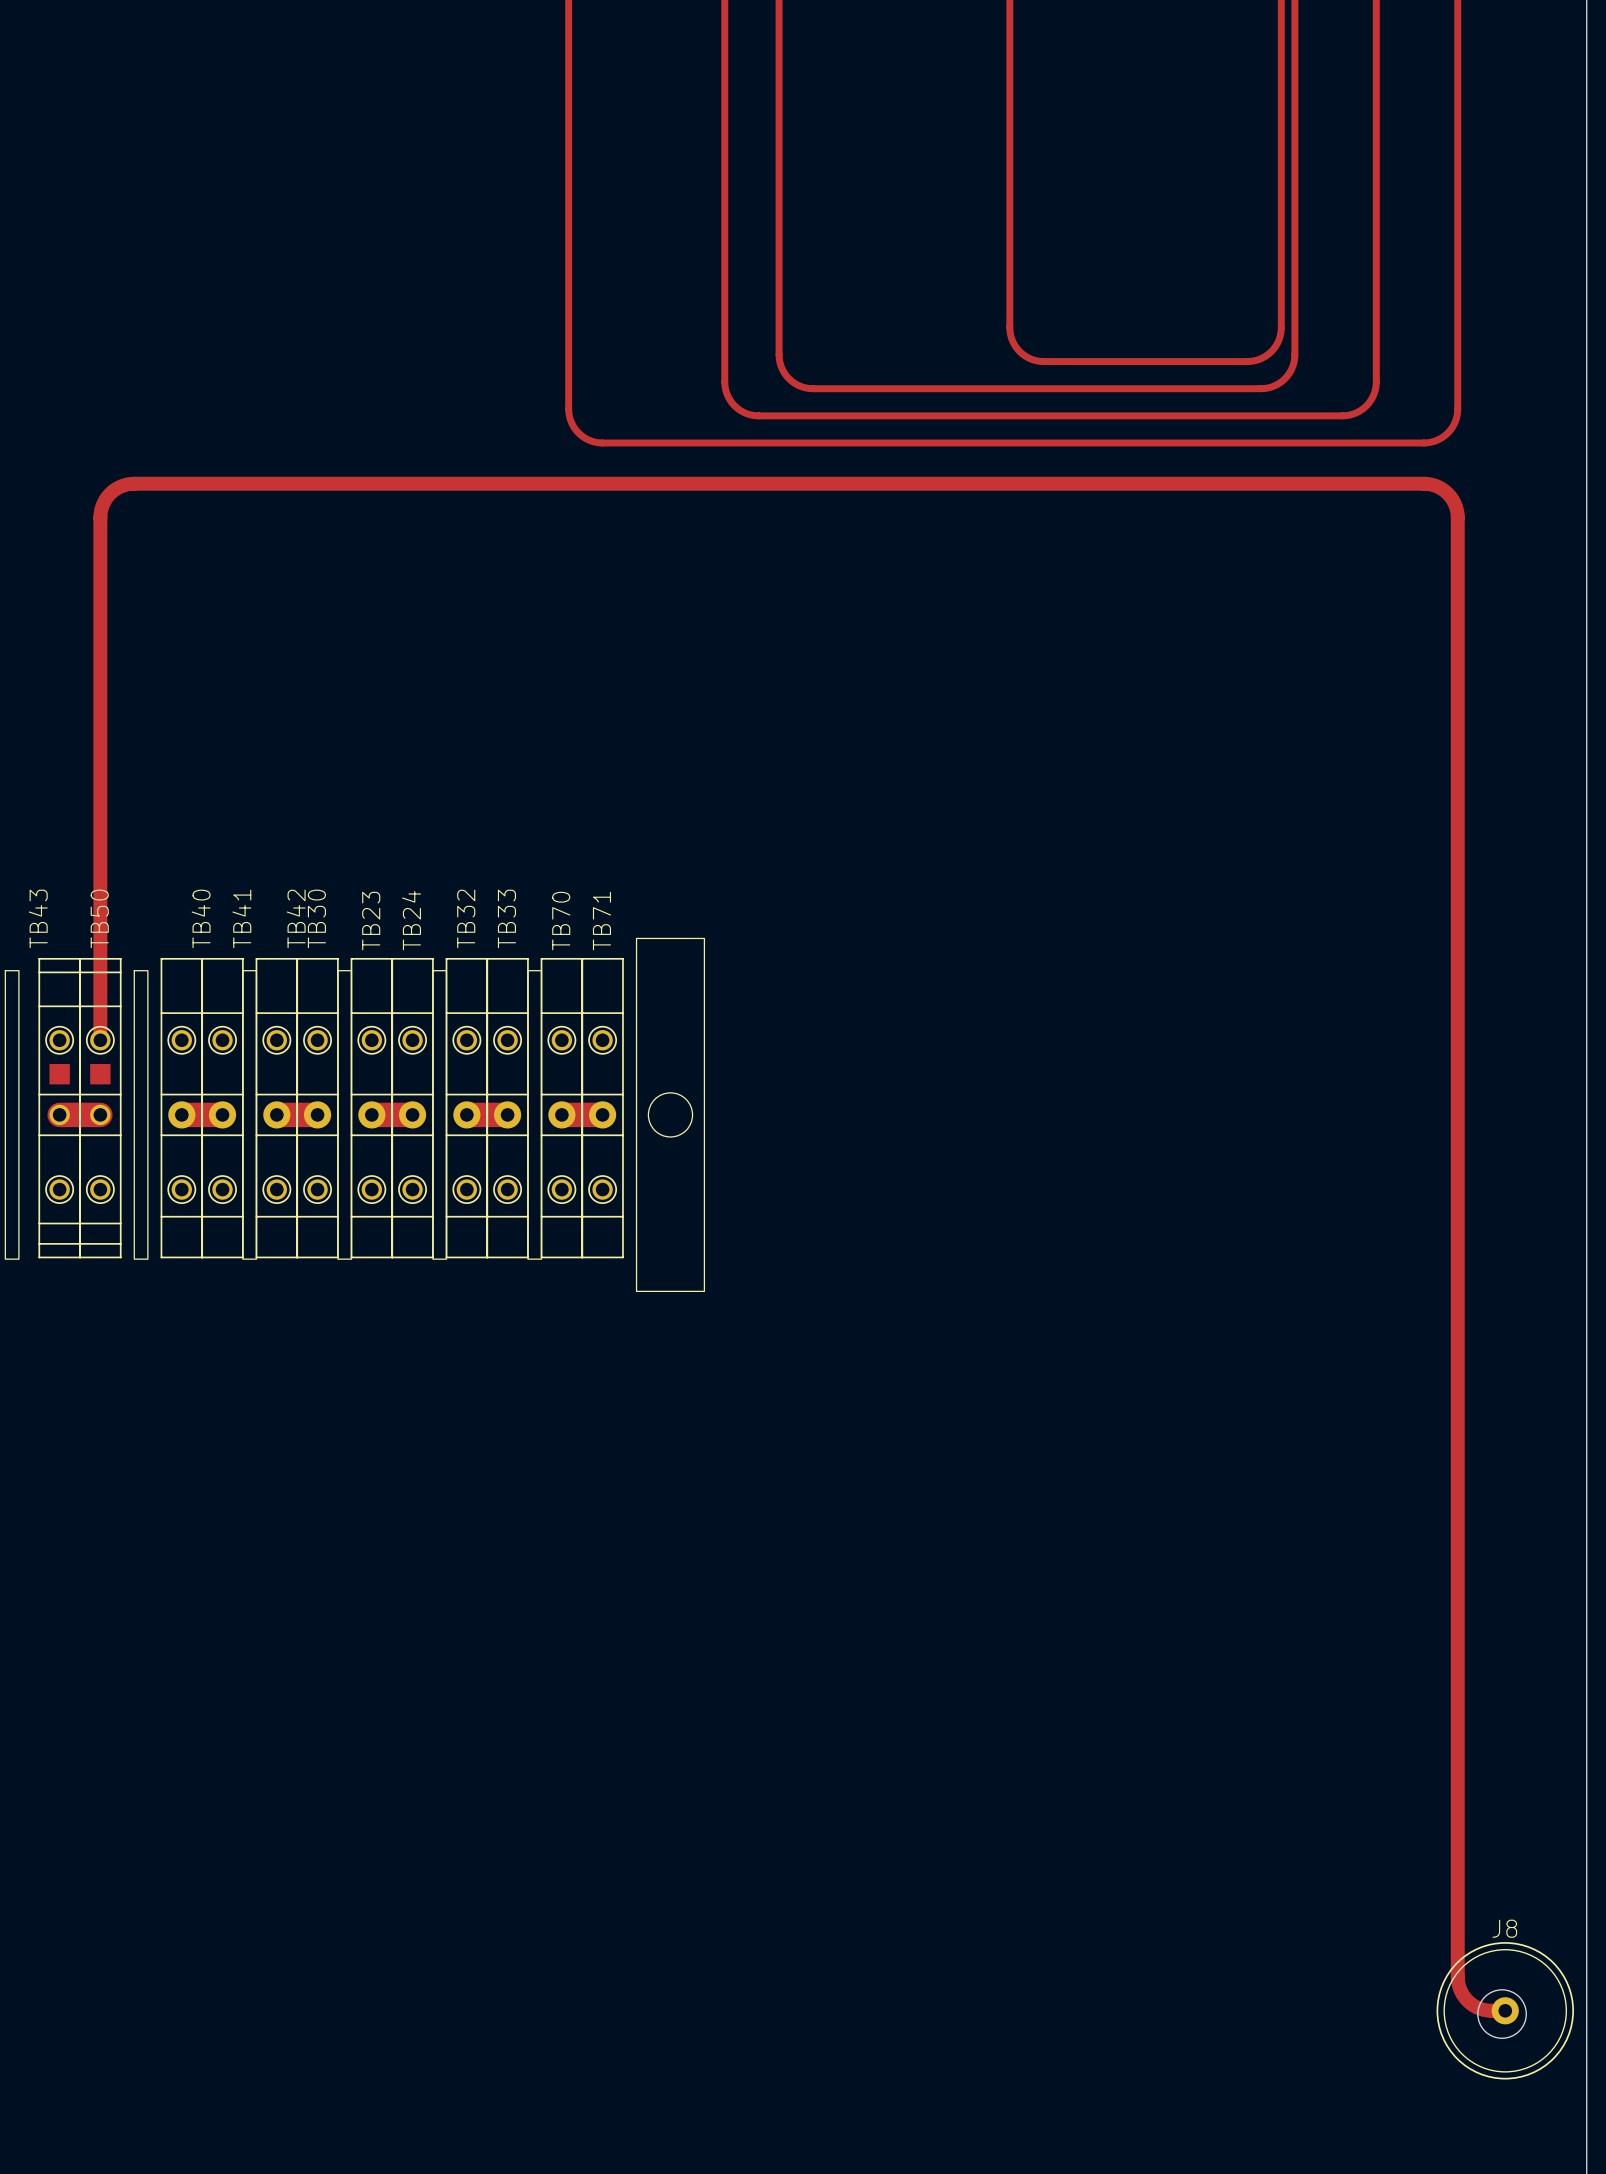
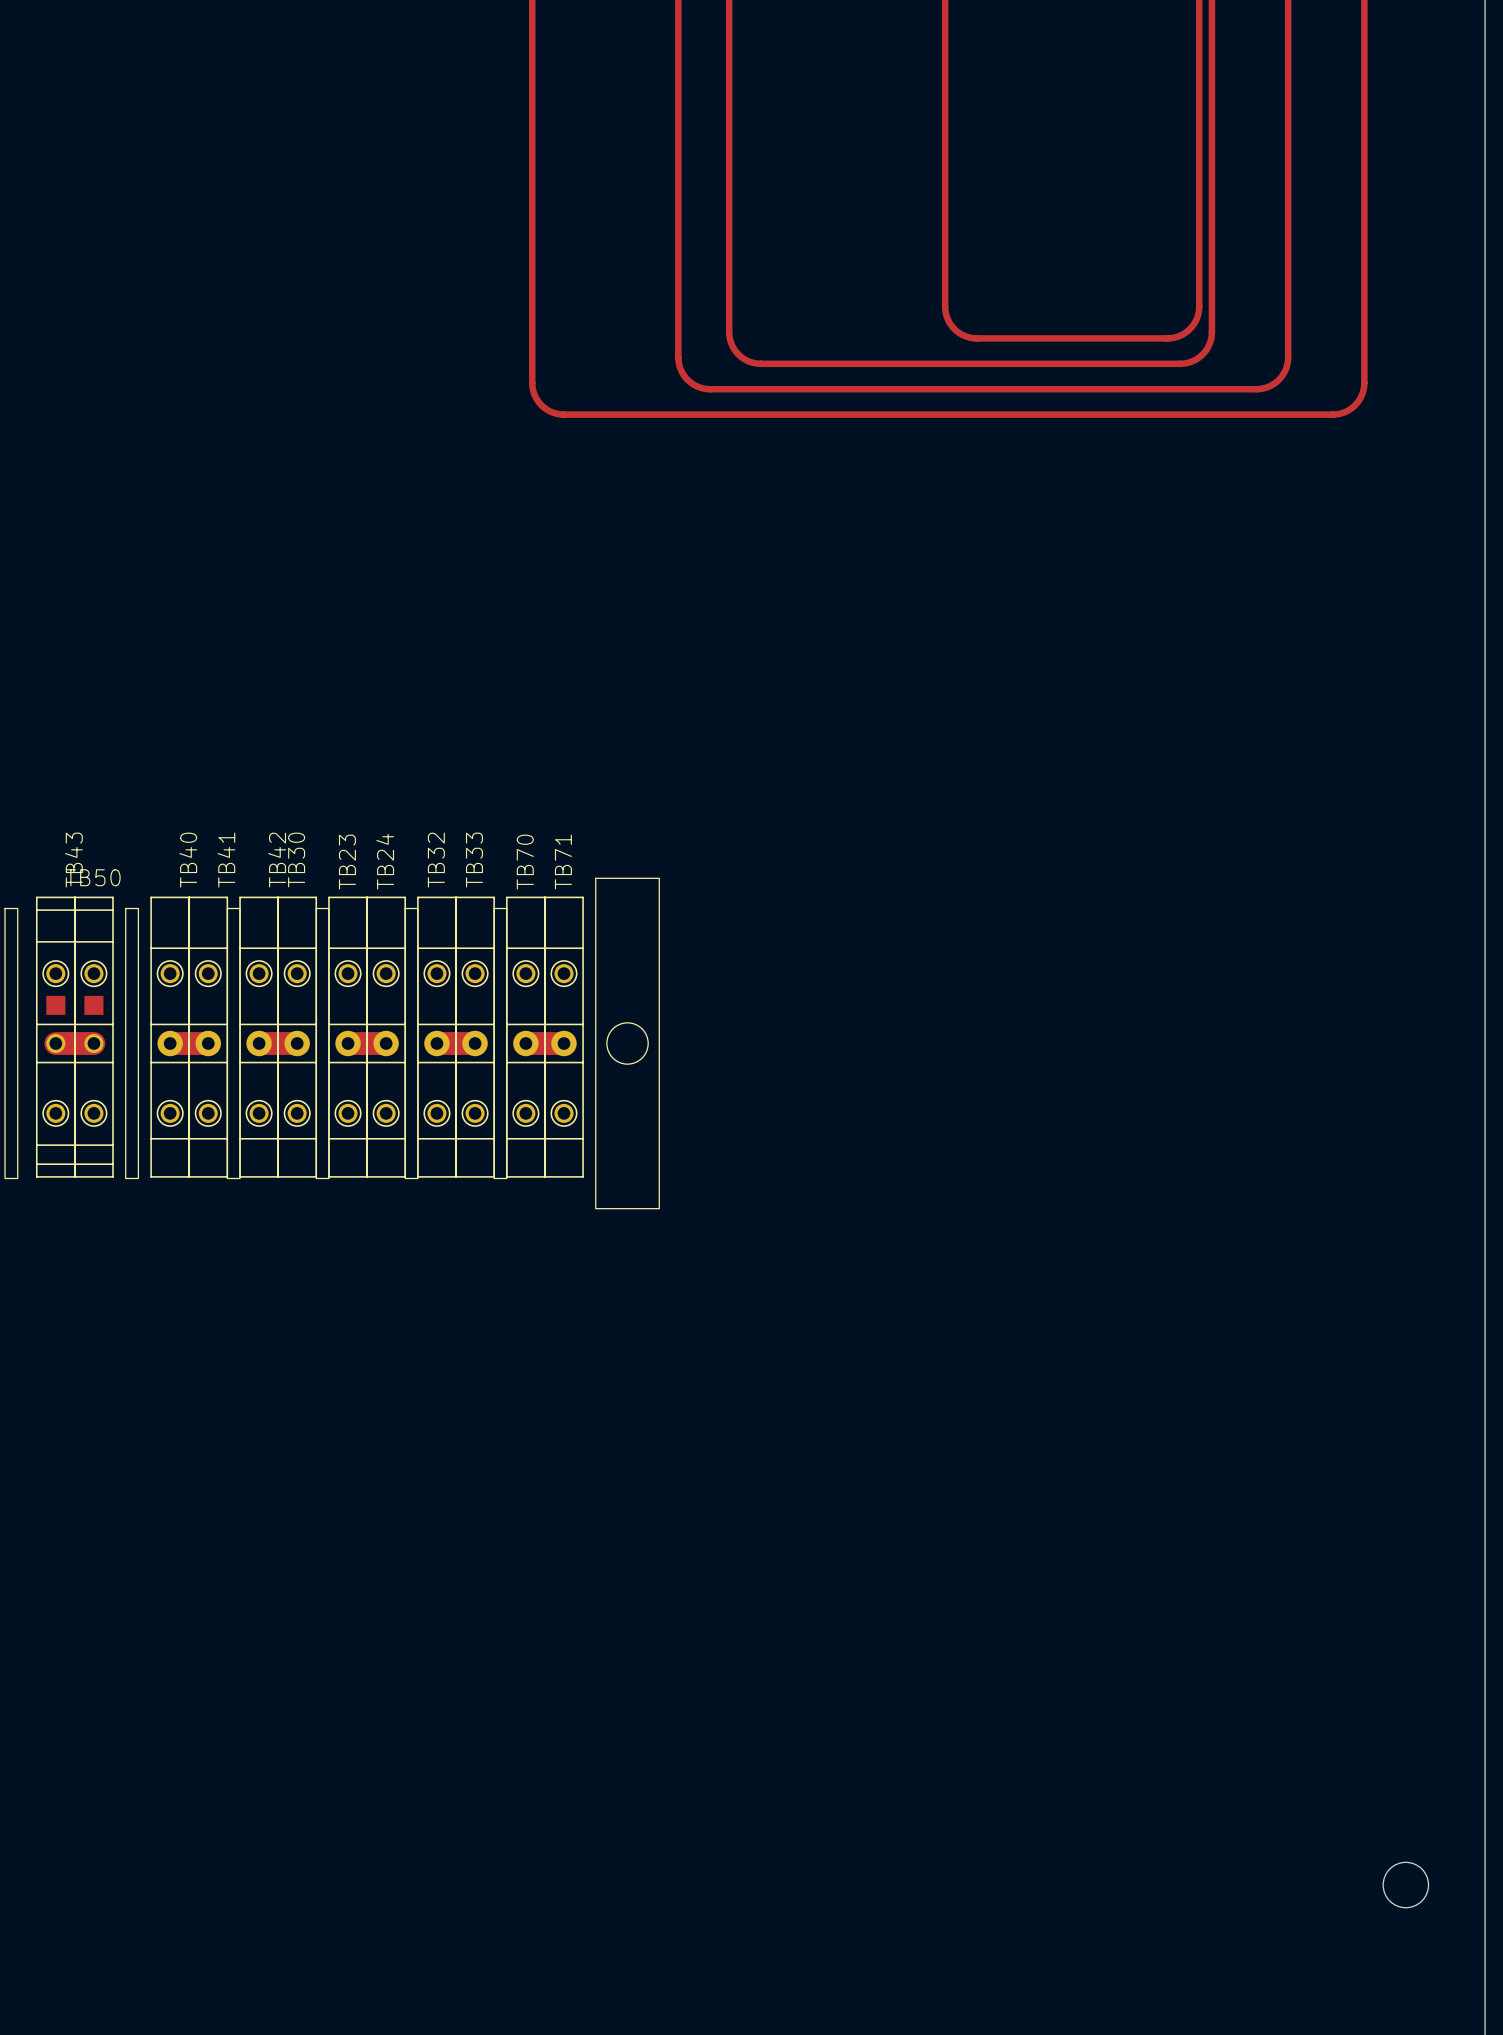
TB43 name position: TB43 (38, 918) -> TB43 (73, 860)
TB50 name rotation: 0° (99, 918) -> 90° clockwise (93, 877)
track: (100, 1040) (100, 517) (102, 506) (107, 496) (123, 485) (134, 483) (1423, 483) (1441, 488) (1452, 499) (1457, 517) (1457, 1976) (1461, 1991) (1470, 2003) (1484, 2009) (1505, 2010) -> none
J8: (1505, 2010) -> none

